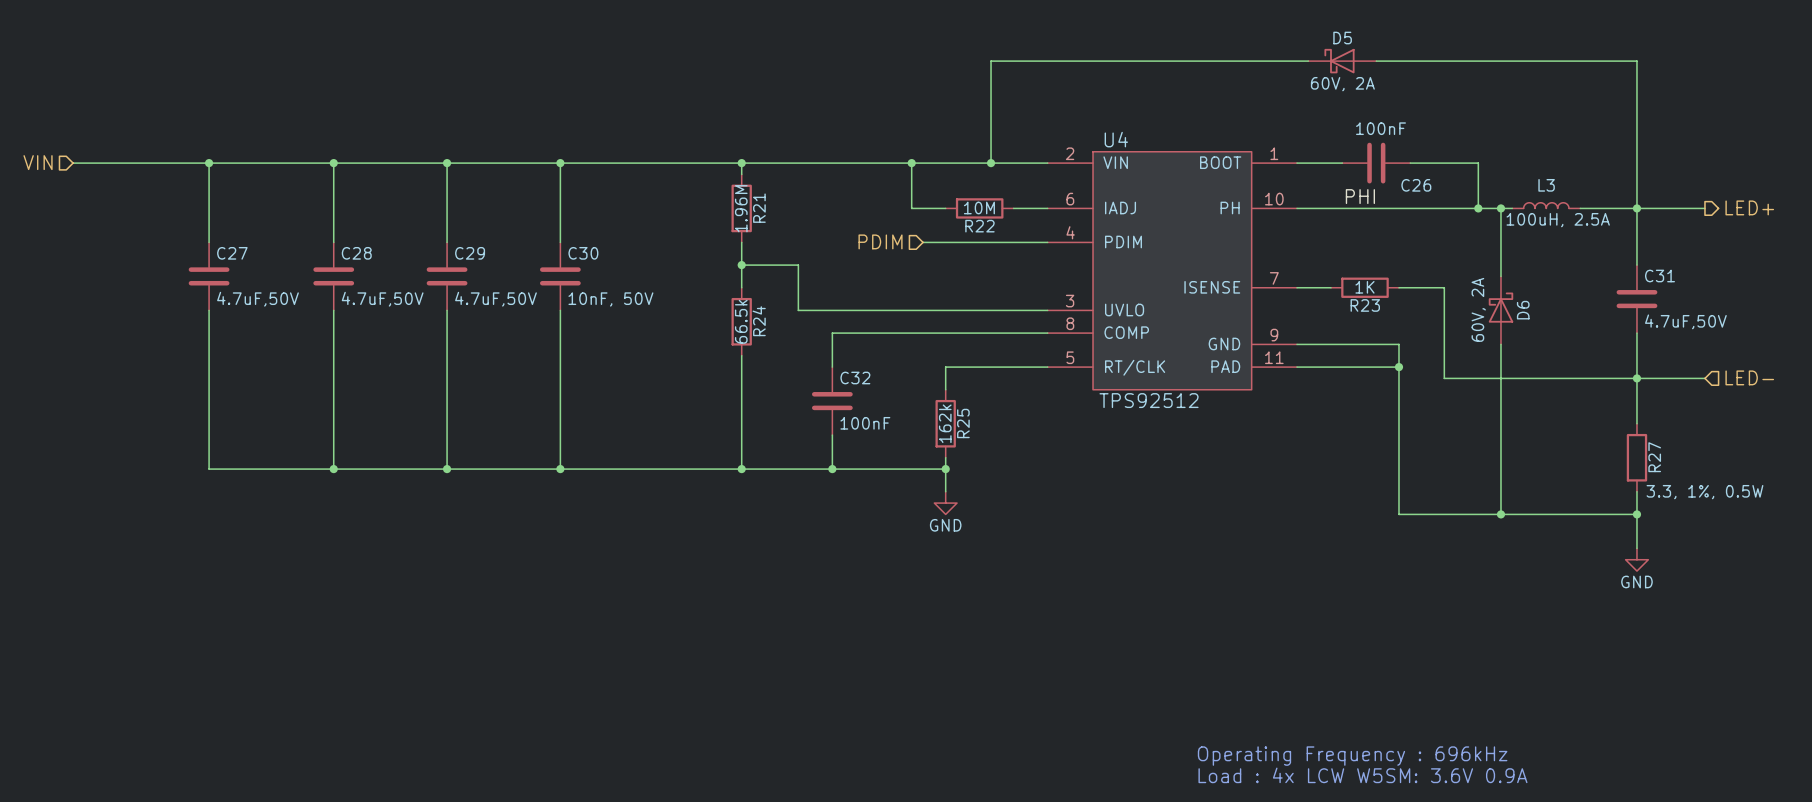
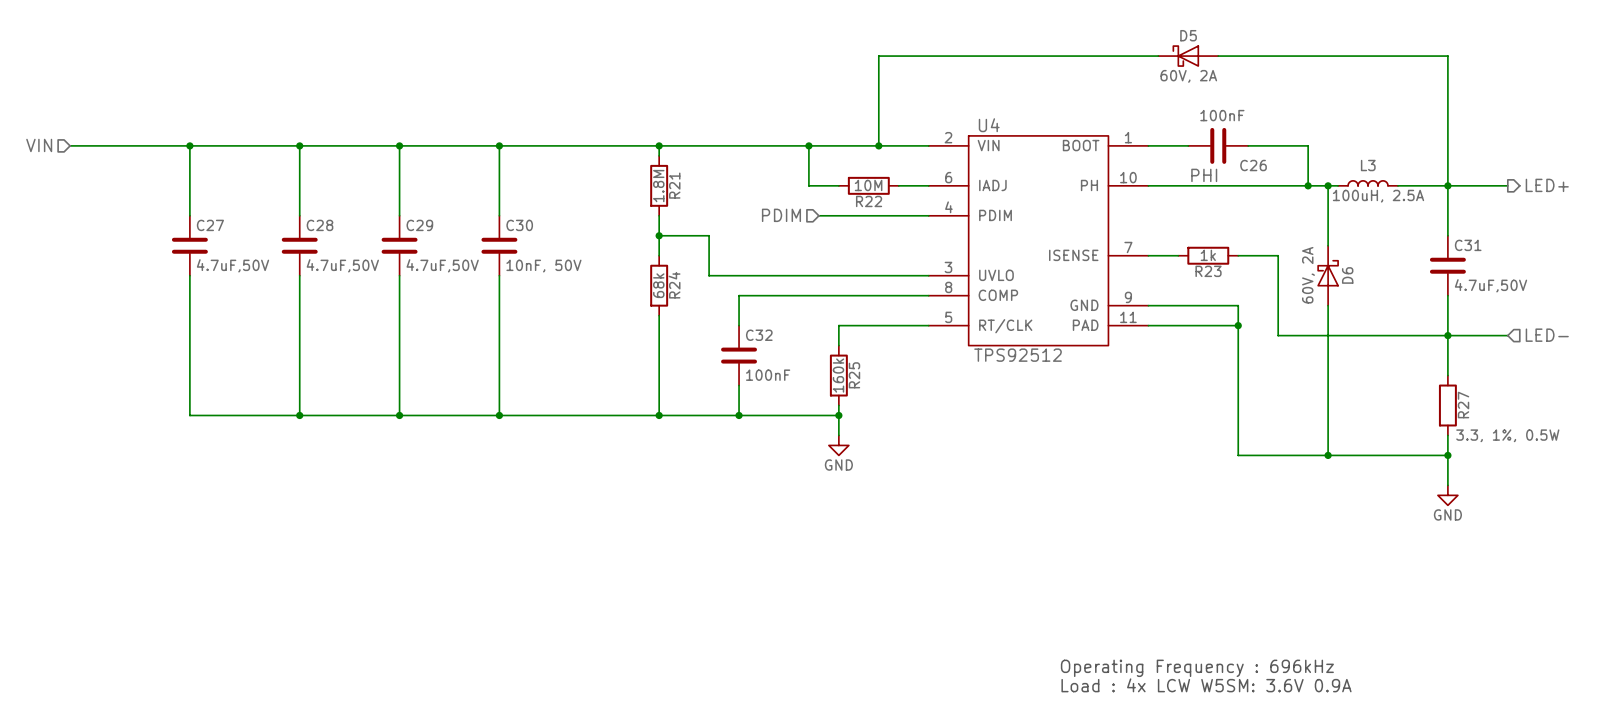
R21 value: 1.96M (741, 208) -> 1.8M (658, 186)
R23 value: 1K (1364, 287) -> 1k (1208, 255)
R24 value: 66.5k (741, 321) -> 68k (658, 285)
R25 value: 162k (945, 423) -> 160k (838, 375)

